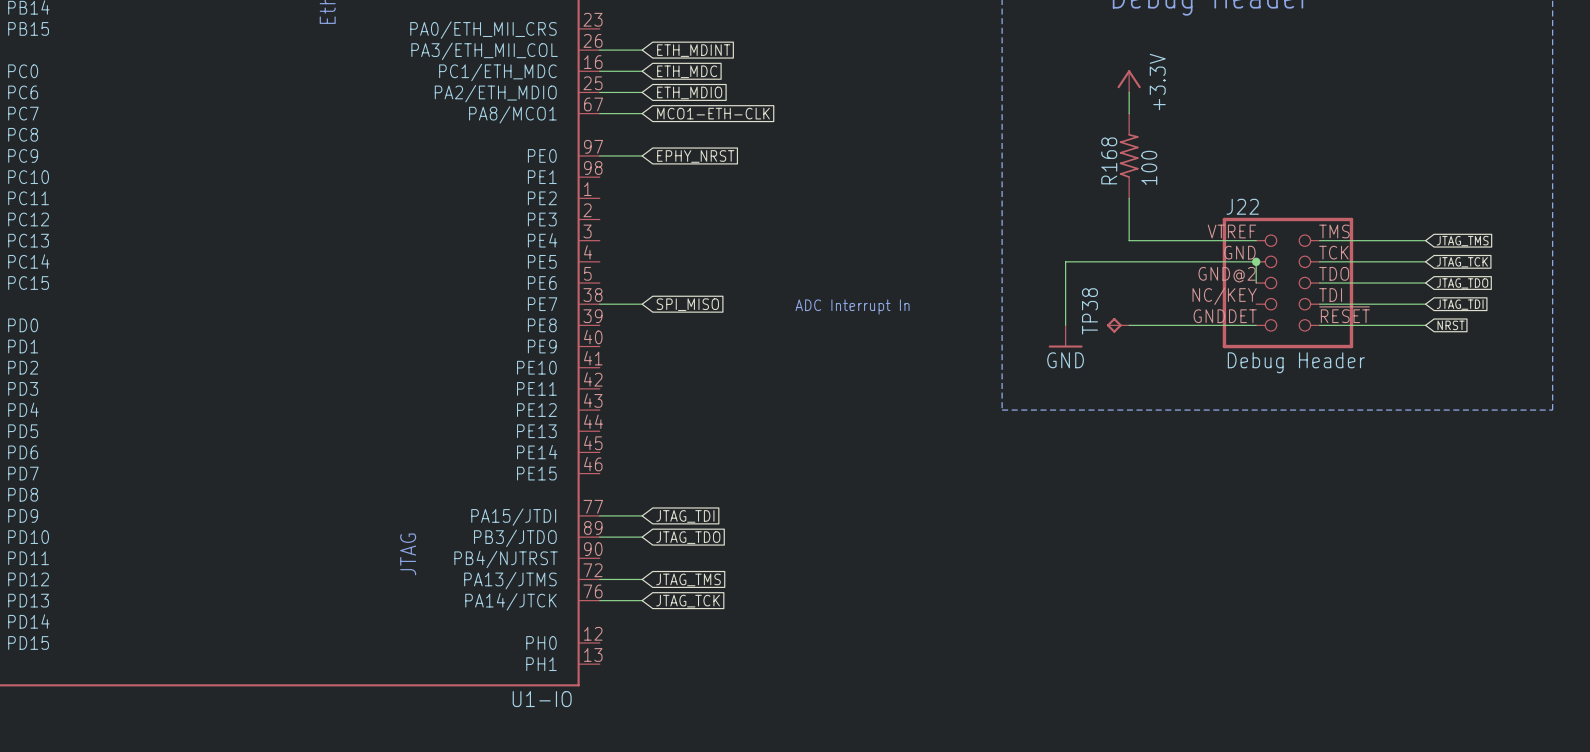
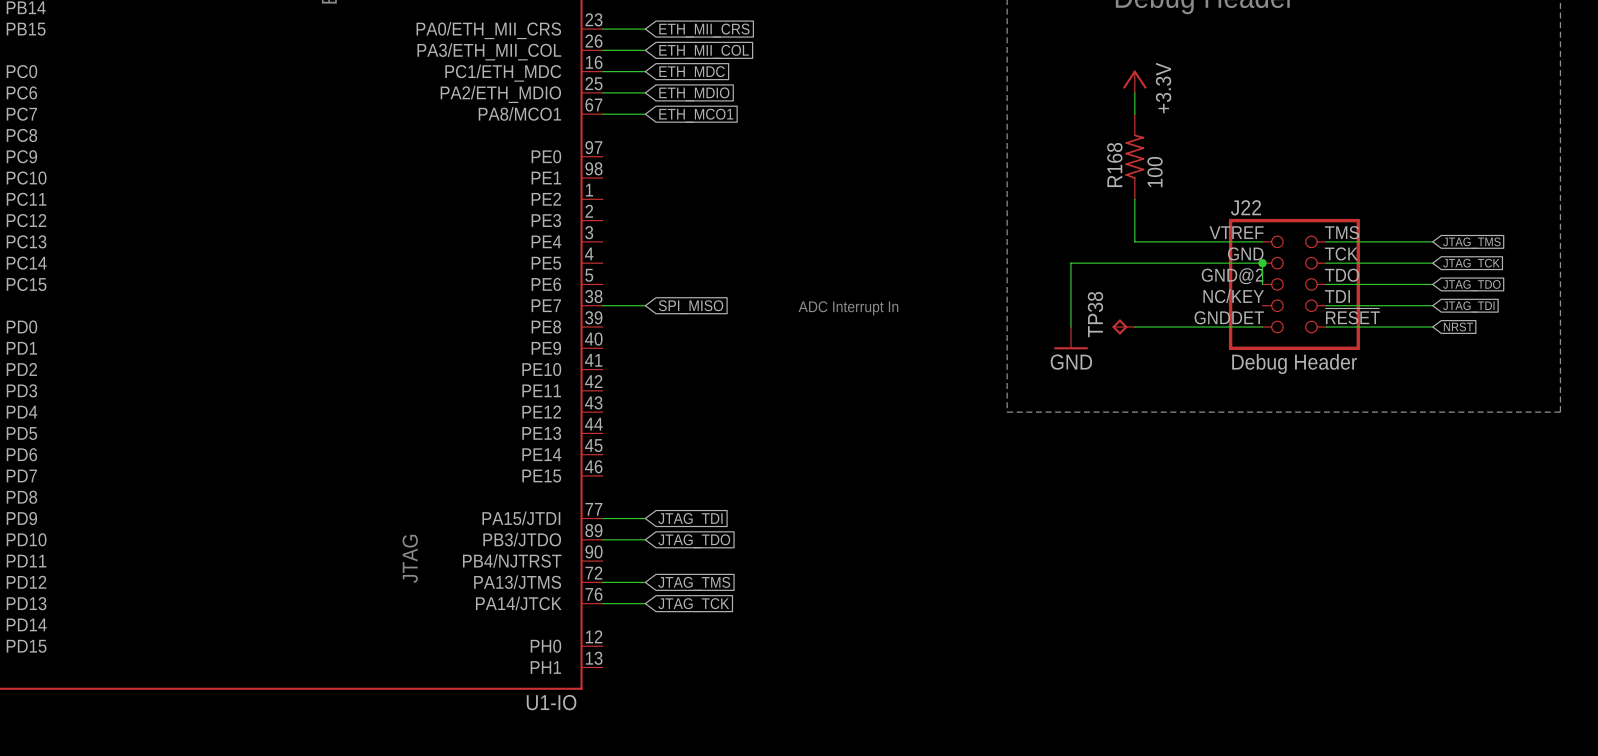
global label: none -> ETH_MII_CRS (704, 30)
global label: ETH_MDINT (693, 50) -> ETH_MII_COL (704, 51)
global label: MCO1-ETH-CLK (713, 113) -> ETH_MCO1 (696, 115)
wire: (599, 155) (642, 155) -> (602, 29) (645, 29)
global label: EPHY_NRST (695, 156) -> none

